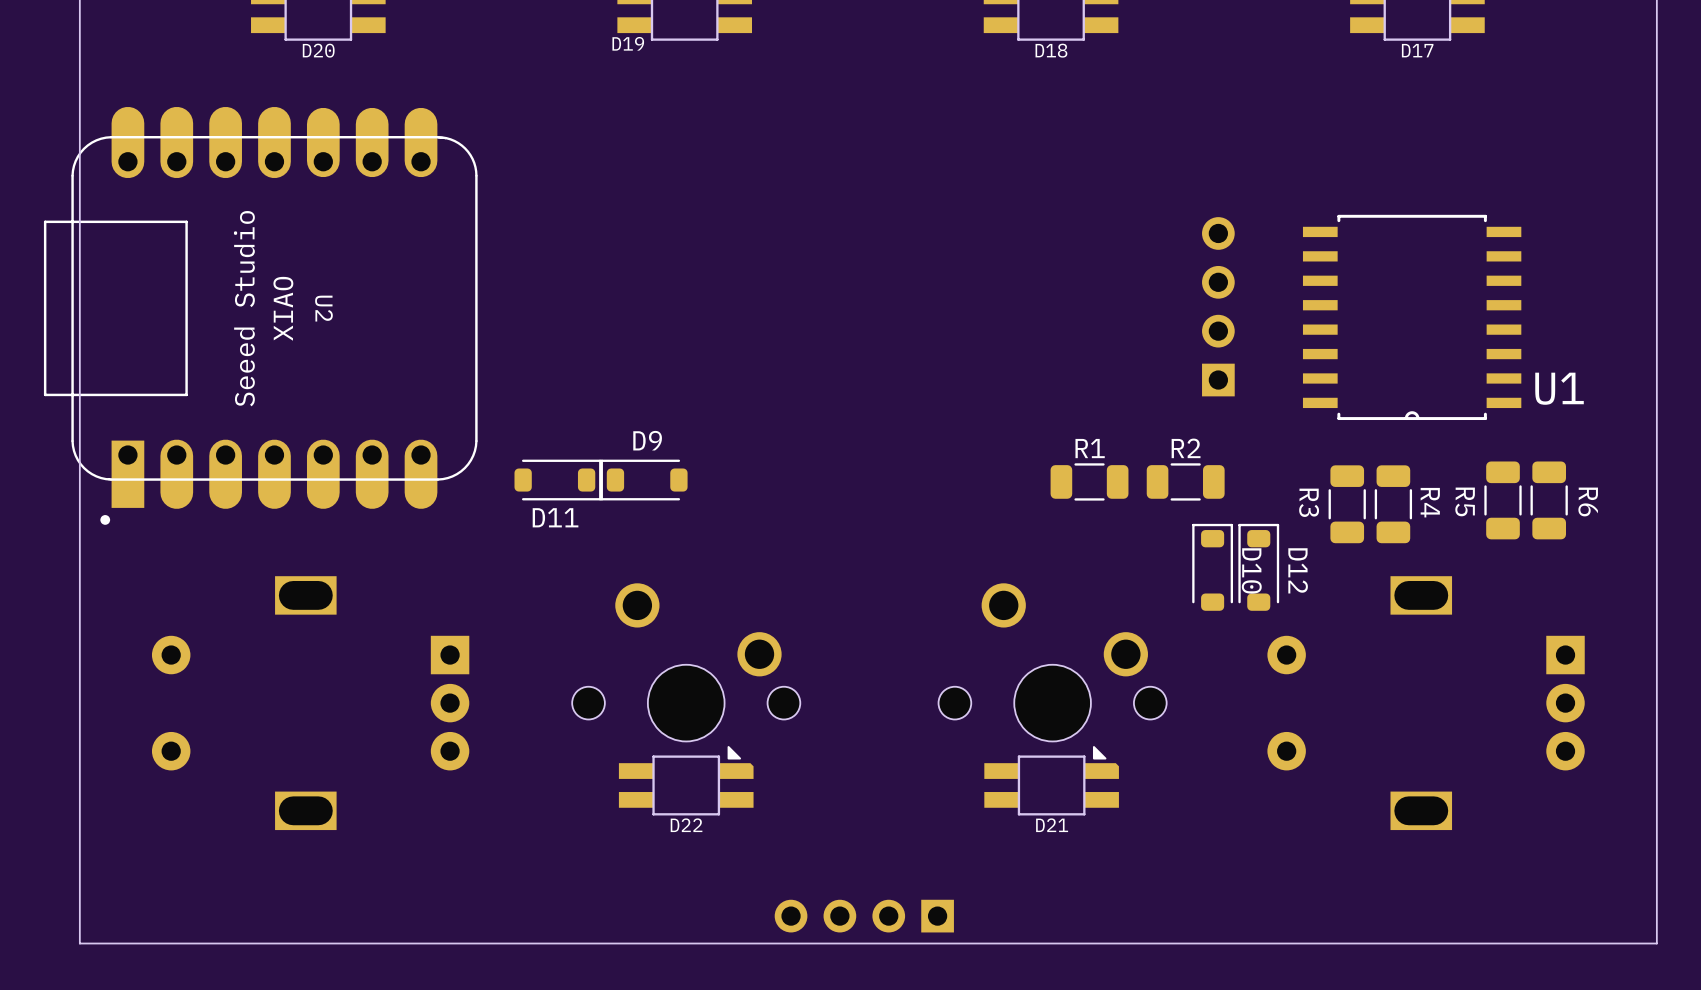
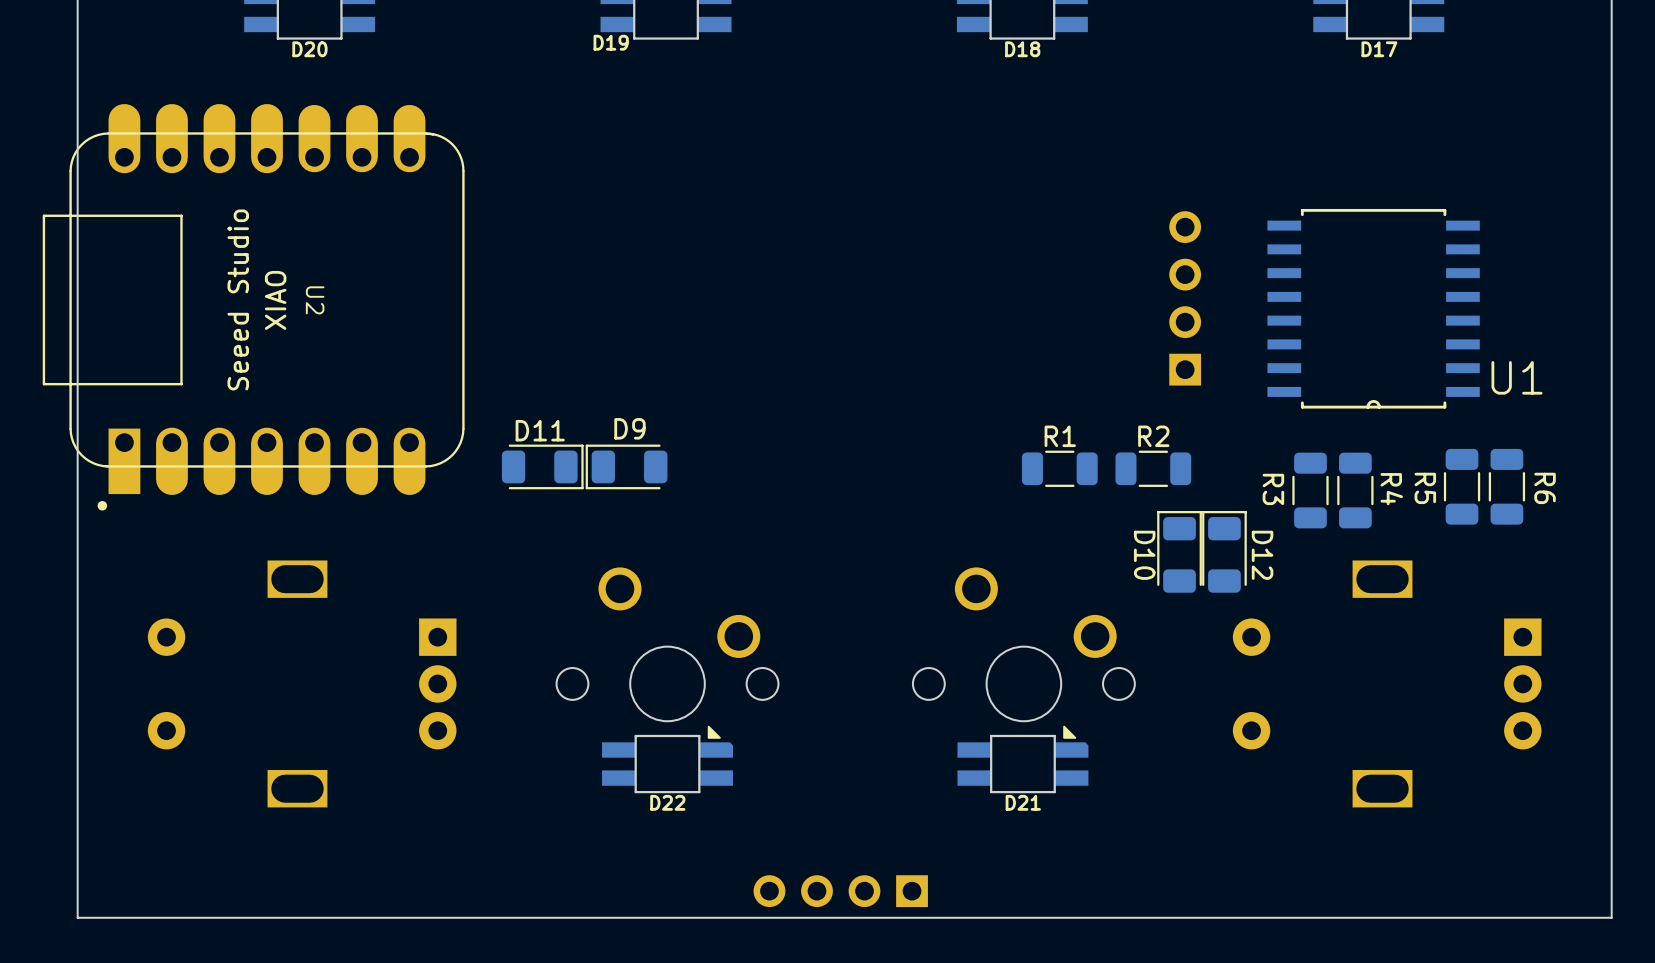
D11 footprint: [514, 459, 602, 501] -> [501, 444, 584, 490]
D9 footprint: [600, 459, 688, 501] -> [585, 444, 668, 490]
D11 name position: D11 (555, 517) -> D11 (540, 430)
D10 footprint: [1192, 523, 1233, 611] -> [1157, 510, 1202, 593]
D12 footprint: [1238, 523, 1280, 611] -> [1202, 510, 1247, 593]
D10 name position: D10 (1251, 570) -> D10 (1144, 555)

